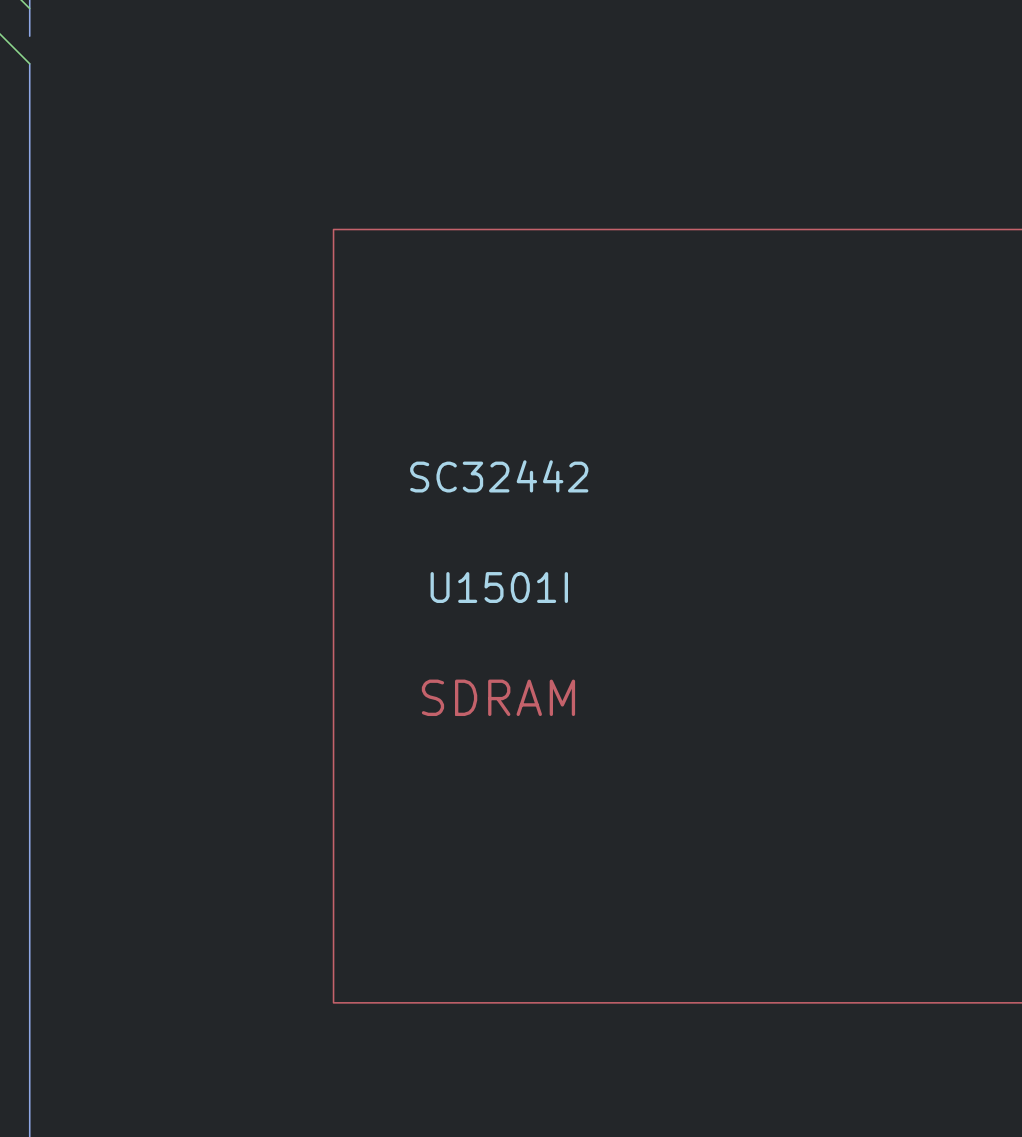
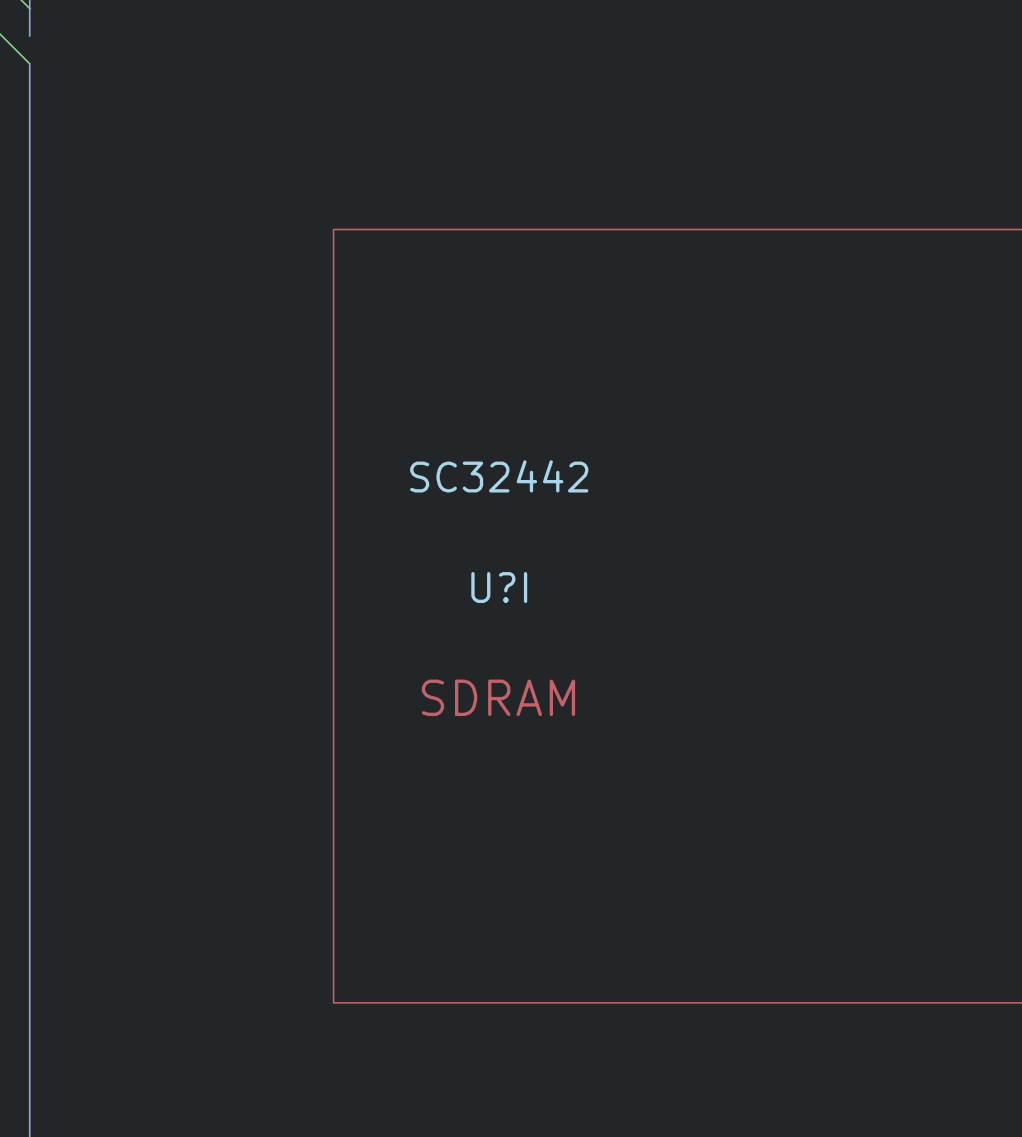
U1501I name: U1501I (499, 587) -> U?I (499, 587)

